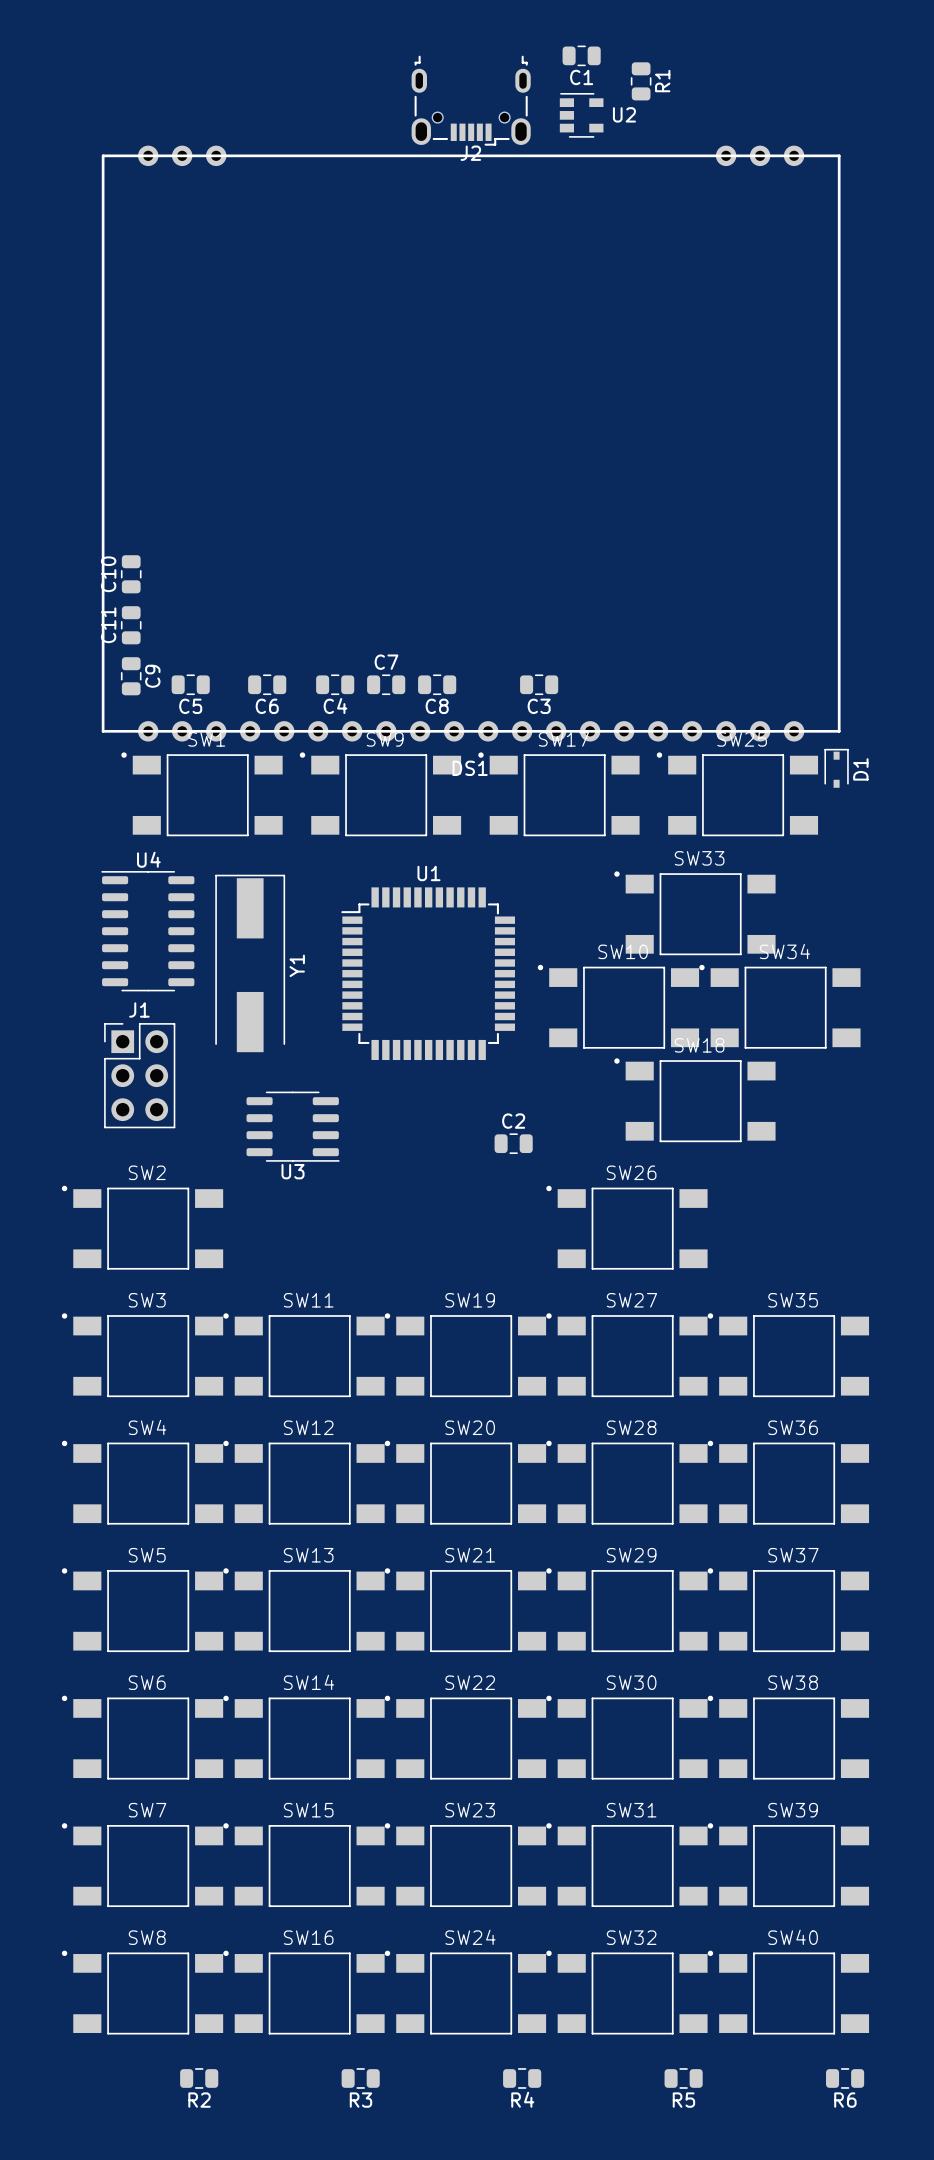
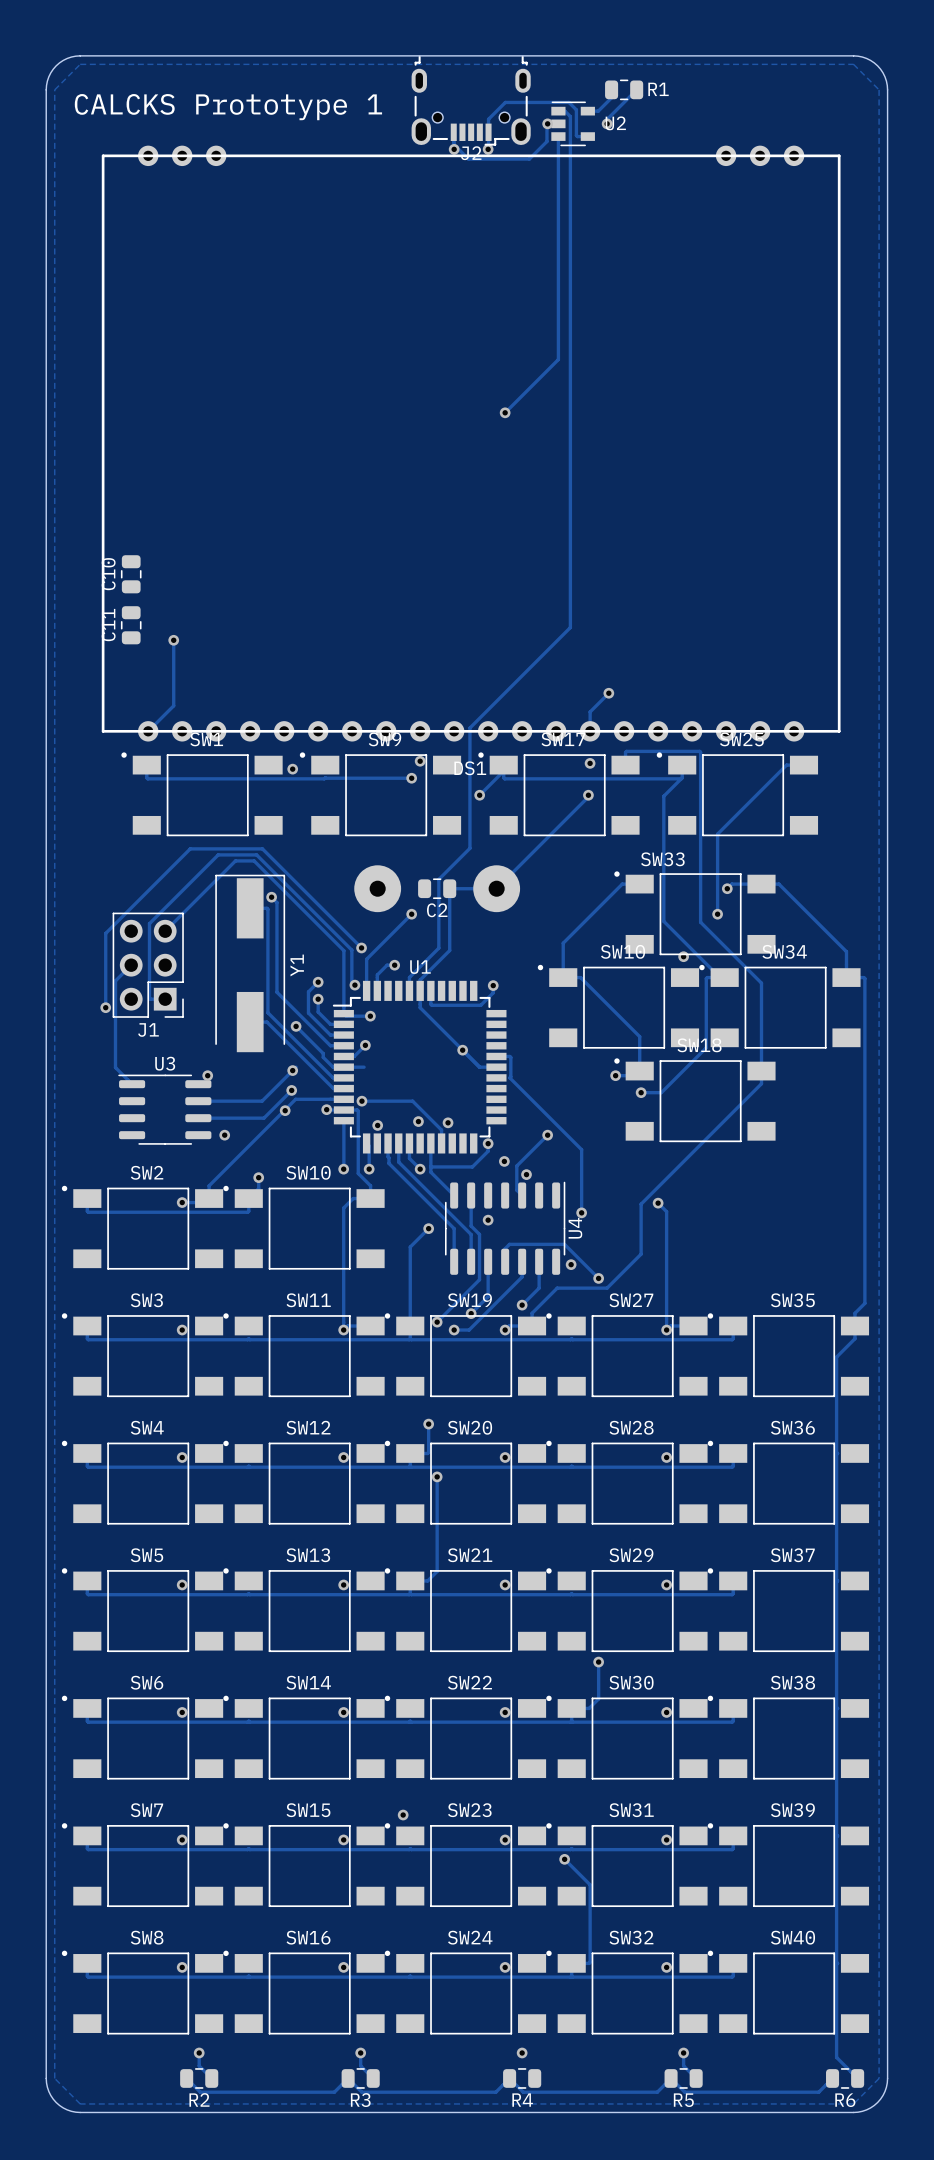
C1: (581, 55) -> none
zone outline: none -> (80, 64) (54, 89) (54, 2078) (80, 2103) (853, 2103) (879, 2078) (879, 89) (853, 64) (80, 64)
R1 rotation: 0° (641, 81) -> 90° clockwise (624, 89)
board edge: none -> (46, 89) (46, 2078) (48, 2091) (56, 2102) (67, 2109) (80, 2112)
board edge: none -> (46, 89) (48, 76) (56, 65) (67, 58) (80, 55) (853, 55) (866, 58) (877, 65) (884, 76) (887, 89) (887, 2078) (884, 2091) (880, 2099) (870, 2107) (853, 2112) (80, 2112)
track: none -> (611, 89) (611, 97) (598, 111) (587, 111)
track: none -> (636, 89) (607, 119) (607, 123)
text: none -> CALCKS Prototype 1 (228, 107)
track: none -> (558, 111) (564, 111) (570, 116) (570, 627) (469, 727) (469, 848) (438, 879) (438, 948) (409, 977) (409, 990)
U2 position: (581, 115) -> (573, 123)
via: none -> (547, 123)
track: none -> (558, 123) (546, 124) (546, 141) (529, 159) (468, 159) (453, 144)
via: none -> (607, 123)
track: none -> (558, 136) (558, 359) (505, 412)
track: none -> (587, 136) (576, 135) (576, 109) (568, 102) (505, 102) (488, 119) (488, 149)
via: none -> (454, 149)
via: none -> (488, 149)
via: none -> (505, 412)
track: none -> (173, 640) (173, 705) (148, 731)
via: none -> (173, 640)
C9: (131, 676) -> none
C5: (190, 684) -> none
C6: (267, 684) -> none
C4: (335, 684) -> none
C7: (386, 684) -> none
C8: (437, 684) -> none
C3: (539, 684) -> none
track: none -> (608, 693) (590, 711) (590, 731)
via: none -> (608, 693)
via: none -> (420, 761)
via: none -> (590, 763)
track: none -> (146, 765) (147, 778) (411, 778)
track: none -> (503, 765) (504, 778) (681, 778)
track: none -> (625, 765) (626, 751) (700, 752) (700, 922) (761, 983) (761, 1083) (641, 1204) (641, 1254) (607, 1288) (557, 1288) (532, 1313) (532, 1326) (509, 1326) (505, 1330)
track: none -> (682, 765) (682, 777) (663, 796) (663, 921) (720, 977)
track: none -> (804, 765) (786, 765) (717, 834) (717, 914)
D1: (836, 768) -> none
via: none -> (292, 769)
track: none -> (503, 771) (479, 795)
via: none -> (411, 778)
via: none -> (479, 795)
track: none -> (588, 795) (496, 888) (449, 888) (449, 950) (420, 980) (420, 1007) (479, 1067) (496, 1067)
via: none -> (588, 795)
SW33 name position: SW33 (699, 858) -> SW33 (662, 859)
track: none -> (639, 884) (622, 884) (563, 943) (563, 977) (580, 977) (639, 1036) (639, 1071) (635, 1075) (615, 1075)
part: none -> (377, 888)
part: none -> (496, 888)
track: none -> (727, 888) (731, 884) (778, 884) (846, 951) (846, 977) (864, 978) (864, 1303) (854, 1313) (854, 1338) (836, 1357) (836, 2057) (857, 2078)
via: none -> (727, 888)
track: none -> (271, 897) (276, 902) (276, 992) (330, 1045) (343, 1045)
via: none -> (271, 897)
track: none -> (250, 908) (267, 909) (267, 1012) (333, 1077) (343, 1077)
track: none -> (411, 914) (366, 959) (366, 990)
via: none -> (411, 914)
via: none -> (717, 914)
U4 rotation: 0° (147, 931) -> 90° clockwise (505, 1228)
U4 position: (147, 931) -> (505, 1228)
track: none -> (165, 931) (235, 860) (254, 860) (343, 950) (343, 1013) (346, 1016) (370, 1016)
track: none -> (361, 947) (262, 848) (190, 848) (105, 933) (105, 1007)
via: none -> (361, 947)
via: none -> (683, 956)
track: none -> (131, 965) (115, 980) (115, 1067) (132, 1084)
track: none -> (394, 965) (387, 965) (377, 974) (377, 990)
via: none -> (394, 965)
U1 position: (428, 973) -> (419, 1067)
track: none -> (724, 977) (706, 978) (706, 1047) (661, 1092) (641, 1092)
track: none -> (318, 982) (308, 991) (308, 1013) (330, 1035) (343, 1035)
via: none -> (318, 982)
track: none -> (354, 985) (351, 982) (351, 950) (256, 854) (218, 854) (149, 923) (149, 998) (165, 999)
via: none -> (354, 985)
track: none -> (493, 985) (493, 992) (480, 1005) (431, 1005) (430, 990)
via: none -> (493, 985)
track: none -> (318, 999) (318, 1012) (330, 1024) (343, 1024)
via: none -> (318, 999)
via: none -> (105, 1007)
via: none -> (370, 1016)
track: none -> (250, 1022) (266, 1022) (333, 1088) (343, 1088)
track: none -> (296, 1026) (323, 1053) (323, 1057) (333, 1067) (364, 1067)
via: none -> (296, 1026)
track: none -> (365, 1045) (354, 1056) (343, 1056)
via: none -> (365, 1045)
via: none -> (462, 1050)
track: none -> (496, 1056) (510, 1057) (509, 1077) (581, 1149) (581, 1212)
track: none -> (296, 1067) (262, 1101) (198, 1101)
via: none -> (292, 1070)
J1 rotation: 0° (139, 1075) -> 180° (148, 965)
J1 position: (139, 1075) -> (148, 965)
via: none -> (207, 1075)
via: none -> (615, 1075)
track: none -> (291, 1090) (263, 1118) (198, 1118)
via: none -> (291, 1090)
via: none -> (641, 1092)
track: none -> (343, 1099) (295, 1099) (209, 1185) (209, 1198) (205, 1202) (182, 1202)
track: none -> (361, 1101) (412, 1101) (441, 1130) (441, 1143)
via: none -> (361, 1101)
track: none -> (326, 1109) (358, 1111) (358, 1173) (370, 1185) (370, 1198) (353, 1198) (343, 1208) (343, 1330) (347, 1326) (370, 1326)
via: none -> (326, 1109)
via: none -> (285, 1110)
track: none -> (343, 1120) (343, 1169)
via: none -> (418, 1121)
C2 name position: C2 (513, 1121) -> C2 (437, 910)
via: none -> (448, 1122)
via: none -> (377, 1125)
U3 rotation: 0° (293, 1126) -> 180° (164, 1109)
U3 position: (293, 1126) -> (164, 1109)
via: none -> (224, 1135)
track: none -> (547, 1135) (516, 1166) (516, 1190) (522, 1195)
via: none -> (547, 1135)
track: none -> (366, 1143) (369, 1146) (369, 1169)
track: none -> (388, 1143) (388, 1163) (454, 1228) (454, 1261)
track: none -> (398, 1143) (398, 1162) (471, 1234) (471, 1261)
track: none -> (409, 1143) (409, 1158) (420, 1169)
track: none -> (430, 1143) (430, 1172) (454, 1195)
track: none -> (488, 1143) (488, 1151) (472, 1166) (430, 1166)
via: none -> (488, 1143)
C2 position: (513, 1143) -> (437, 888)
via: none -> (504, 1161)
via: none -> (343, 1169)
via: none -> (369, 1169)
via: none -> (420, 1169)
via: none -> (526, 1174)
track: none -> (258, 1177) (258, 1188) (248, 1198) (247, 1212) (88, 1212) (87, 1198)
via: none -> (258, 1177)
track: none -> (471, 1195) (471, 1226) (479, 1234) (479, 1279) (437, 1322)
via: none -> (182, 1202)
track: none -> (658, 1203) (666, 1211) (666, 1330) (670, 1326) (693, 1326)
via: none -> (658, 1203)
via: none -> (581, 1212)
via: none -> (488, 1220)
SW10: none -> (304, 1227)
SW26: (626, 1227) -> none
track: none -> (428, 1228) (410, 1247) (410, 1338)
via: none -> (428, 1228)
track: none -> (488, 1261) (488, 1296) (471, 1313)
track: none -> (505, 1261) (505, 1248) (509, 1244) (564, 1244) (598, 1278)
track: none -> (522, 1261) (522, 1277) (469, 1330) (454, 1330)
track: none -> (539, 1261) (539, 1288) (522, 1305)
via: none -> (571, 1264)
via: none -> (598, 1278)
via: none -> (522, 1305)
via: none -> (471, 1313)
via: none -> (437, 1322)
track: none -> (87, 1326) (88, 1339) (410, 1338)
track: none -> (733, 1326) (732, 1339) (410, 1338)
via: none -> (182, 1330)
via: none -> (343, 1330)
via: none -> (454, 1330)
via: none -> (505, 1330)
via: none -> (666, 1330)
track: none -> (428, 1424) (428, 1452) (410, 1453) (410, 1466)
via: none -> (428, 1424)
track: none -> (87, 1453) (88, 1467) (410, 1466)
track: none -> (733, 1453) (732, 1467) (410, 1466)
via: none -> (182, 1457)
via: none -> (343, 1457)
via: none -> (505, 1457)
via: none -> (666, 1457)
track: none -> (437, 1476) (437, 1571) (427, 1580) (410, 1580) (410, 1593)
via: none -> (437, 1476)
track: none -> (87, 1580) (88, 1594) (410, 1593)
track: none -> (733, 1580) (732, 1594) (410, 1593)
via: none -> (182, 1584)
via: none -> (343, 1584)
via: none -> (505, 1584)
via: none -> (666, 1584)
track: none -> (598, 1662) (598, 1698) (589, 1708) (571, 1708) (571, 1721)
via: none -> (598, 1662)
track: none -> (87, 1708) (88, 1722) (571, 1721)
track: none -> (733, 1708) (732, 1722) (571, 1721)
via: none -> (182, 1712)
via: none -> (343, 1712)
via: none -> (505, 1712)
via: none -> (666, 1712)
via: none -> (403, 1815)
track: none -> (87, 1835) (88, 1849) (732, 1849) (733, 1835)
via: none -> (182, 1839)
via: none -> (343, 1839)
via: none -> (505, 1839)
via: none -> (666, 1839)
track: none -> (564, 1859) (590, 1884) (590, 1962) (571, 1963) (571, 1976)
via: none -> (564, 1859)
track: none -> (87, 1963) (88, 1977) (571, 1976)
track: none -> (733, 1963) (732, 1977) (571, 1976)
via: none -> (182, 1967)
via: none -> (343, 1967)
via: none -> (505, 1967)
via: none -> (666, 1967)
track: none -> (199, 2052) (199, 2065) (211, 2078)
via: none -> (199, 2052)
track: none -> (360, 2052) (360, 2065) (373, 2078)
via: none -> (360, 2052)
via: none -> (522, 2052)
track: none -> (683, 2052) (683, 2065) (696, 2078)
via: none -> (683, 2052)
track: none -> (186, 2078) (200, 2092) (334, 2092) (348, 2078) (361, 2092) (495, 2092) (509, 2078) (523, 2092) (657, 2092) (671, 2078) (684, 2092) (818, 2092) (832, 2078)

